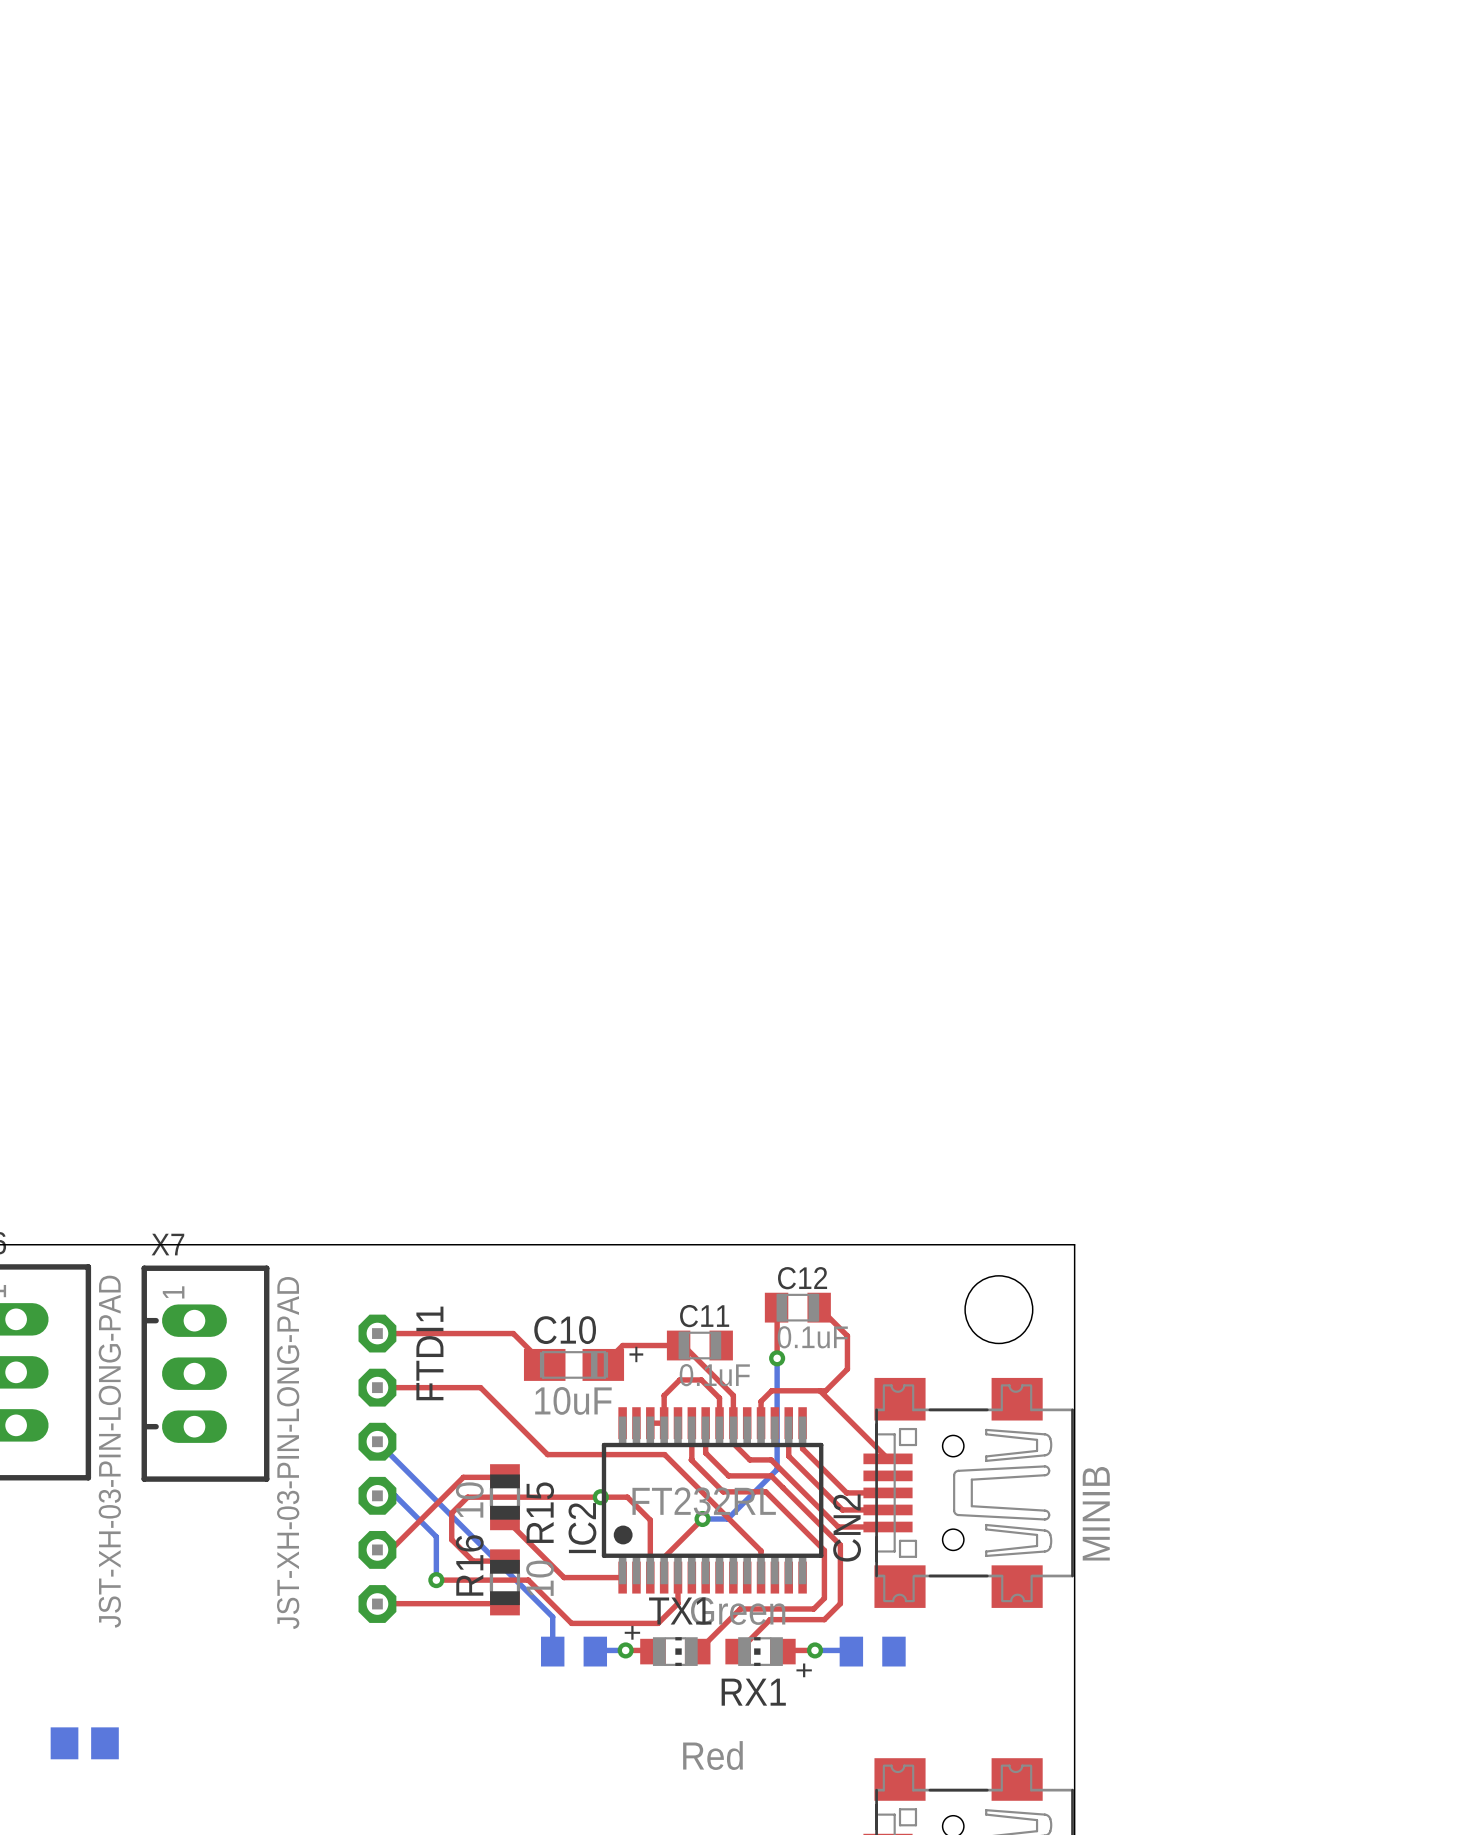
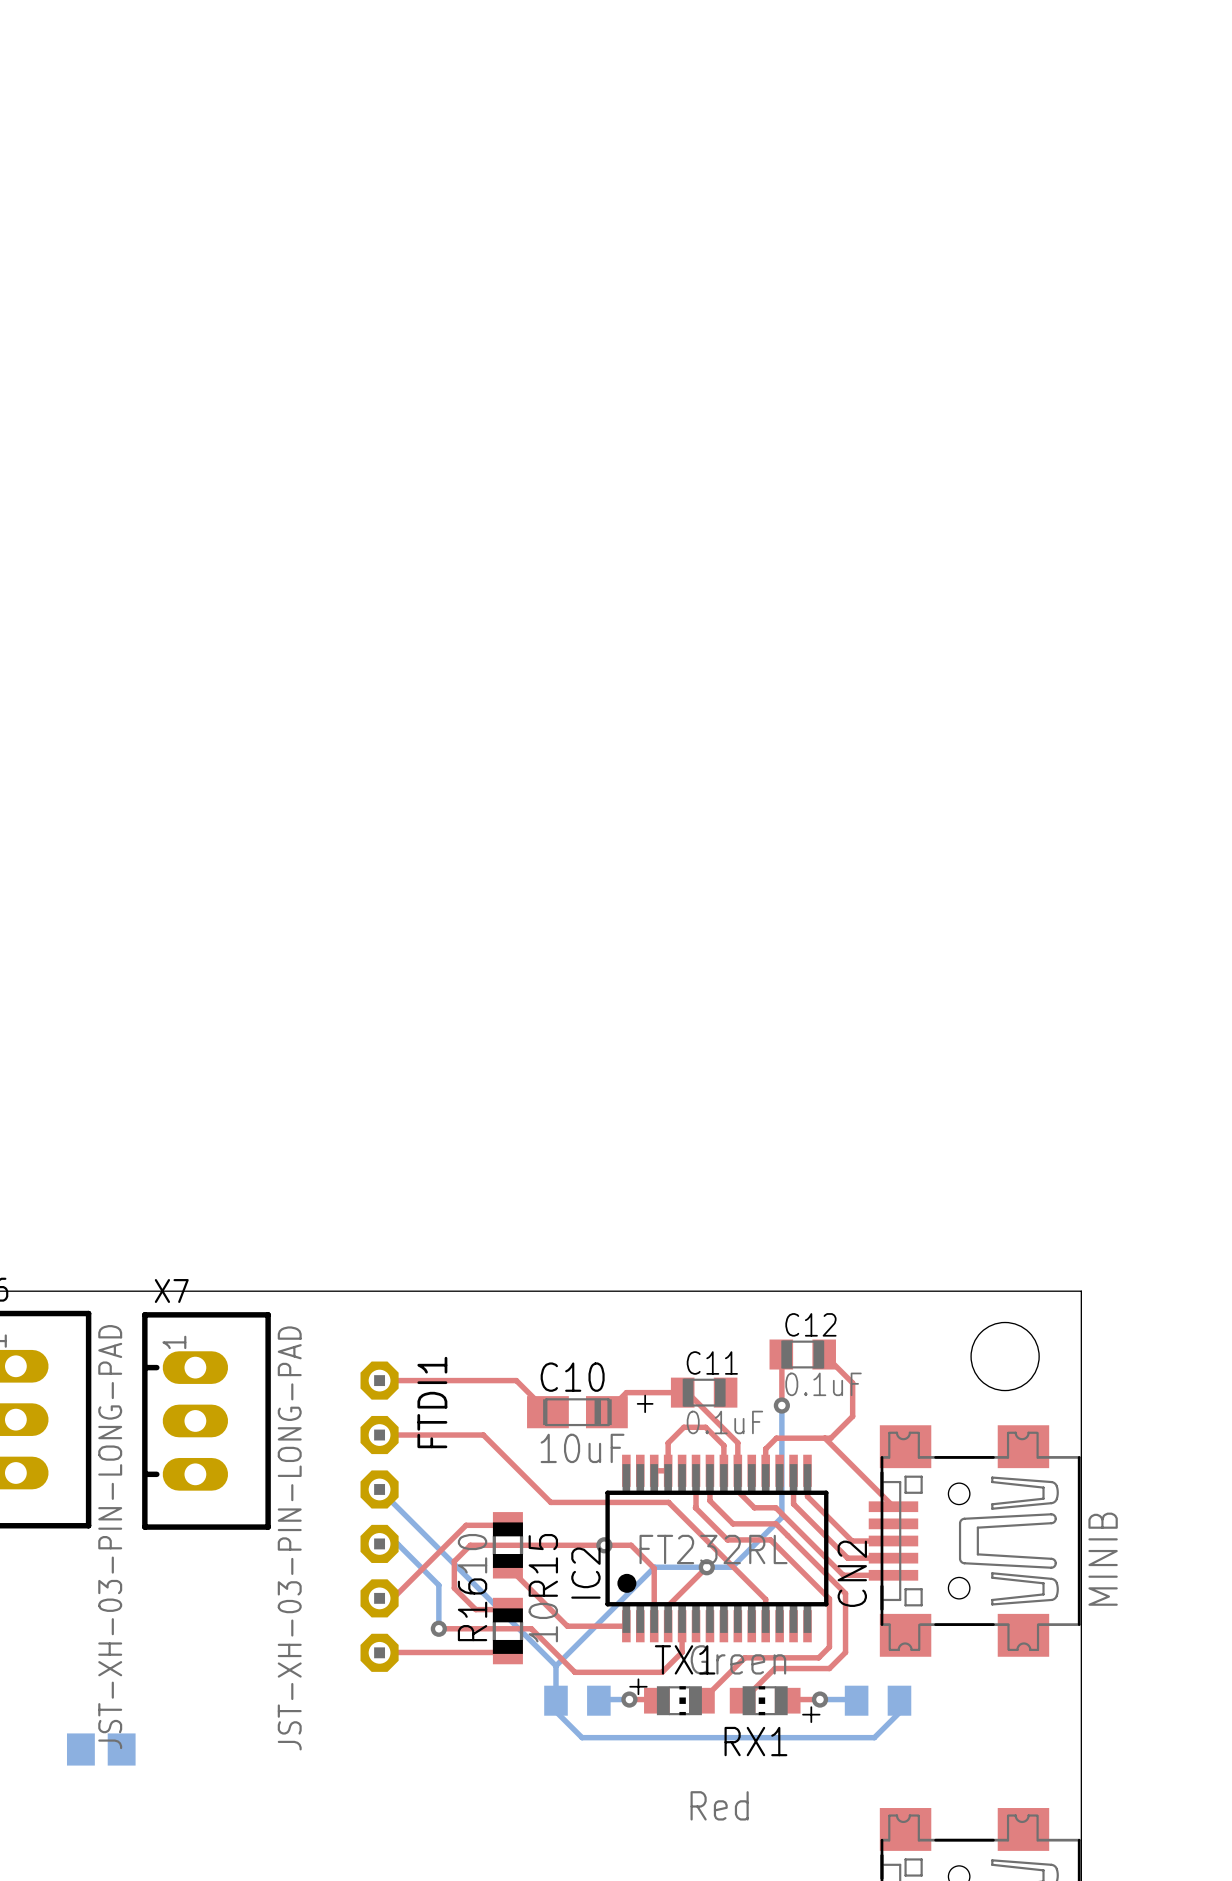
bottom track: none -> (706, 1567) (654, 1567) (555, 1665)
bottom track: none -> (555, 1700) (555, 1711) (582, 1737) (874, 1737) (899, 1712) (899, 1700)
part position: (84, 1743) -> (101, 1749)

